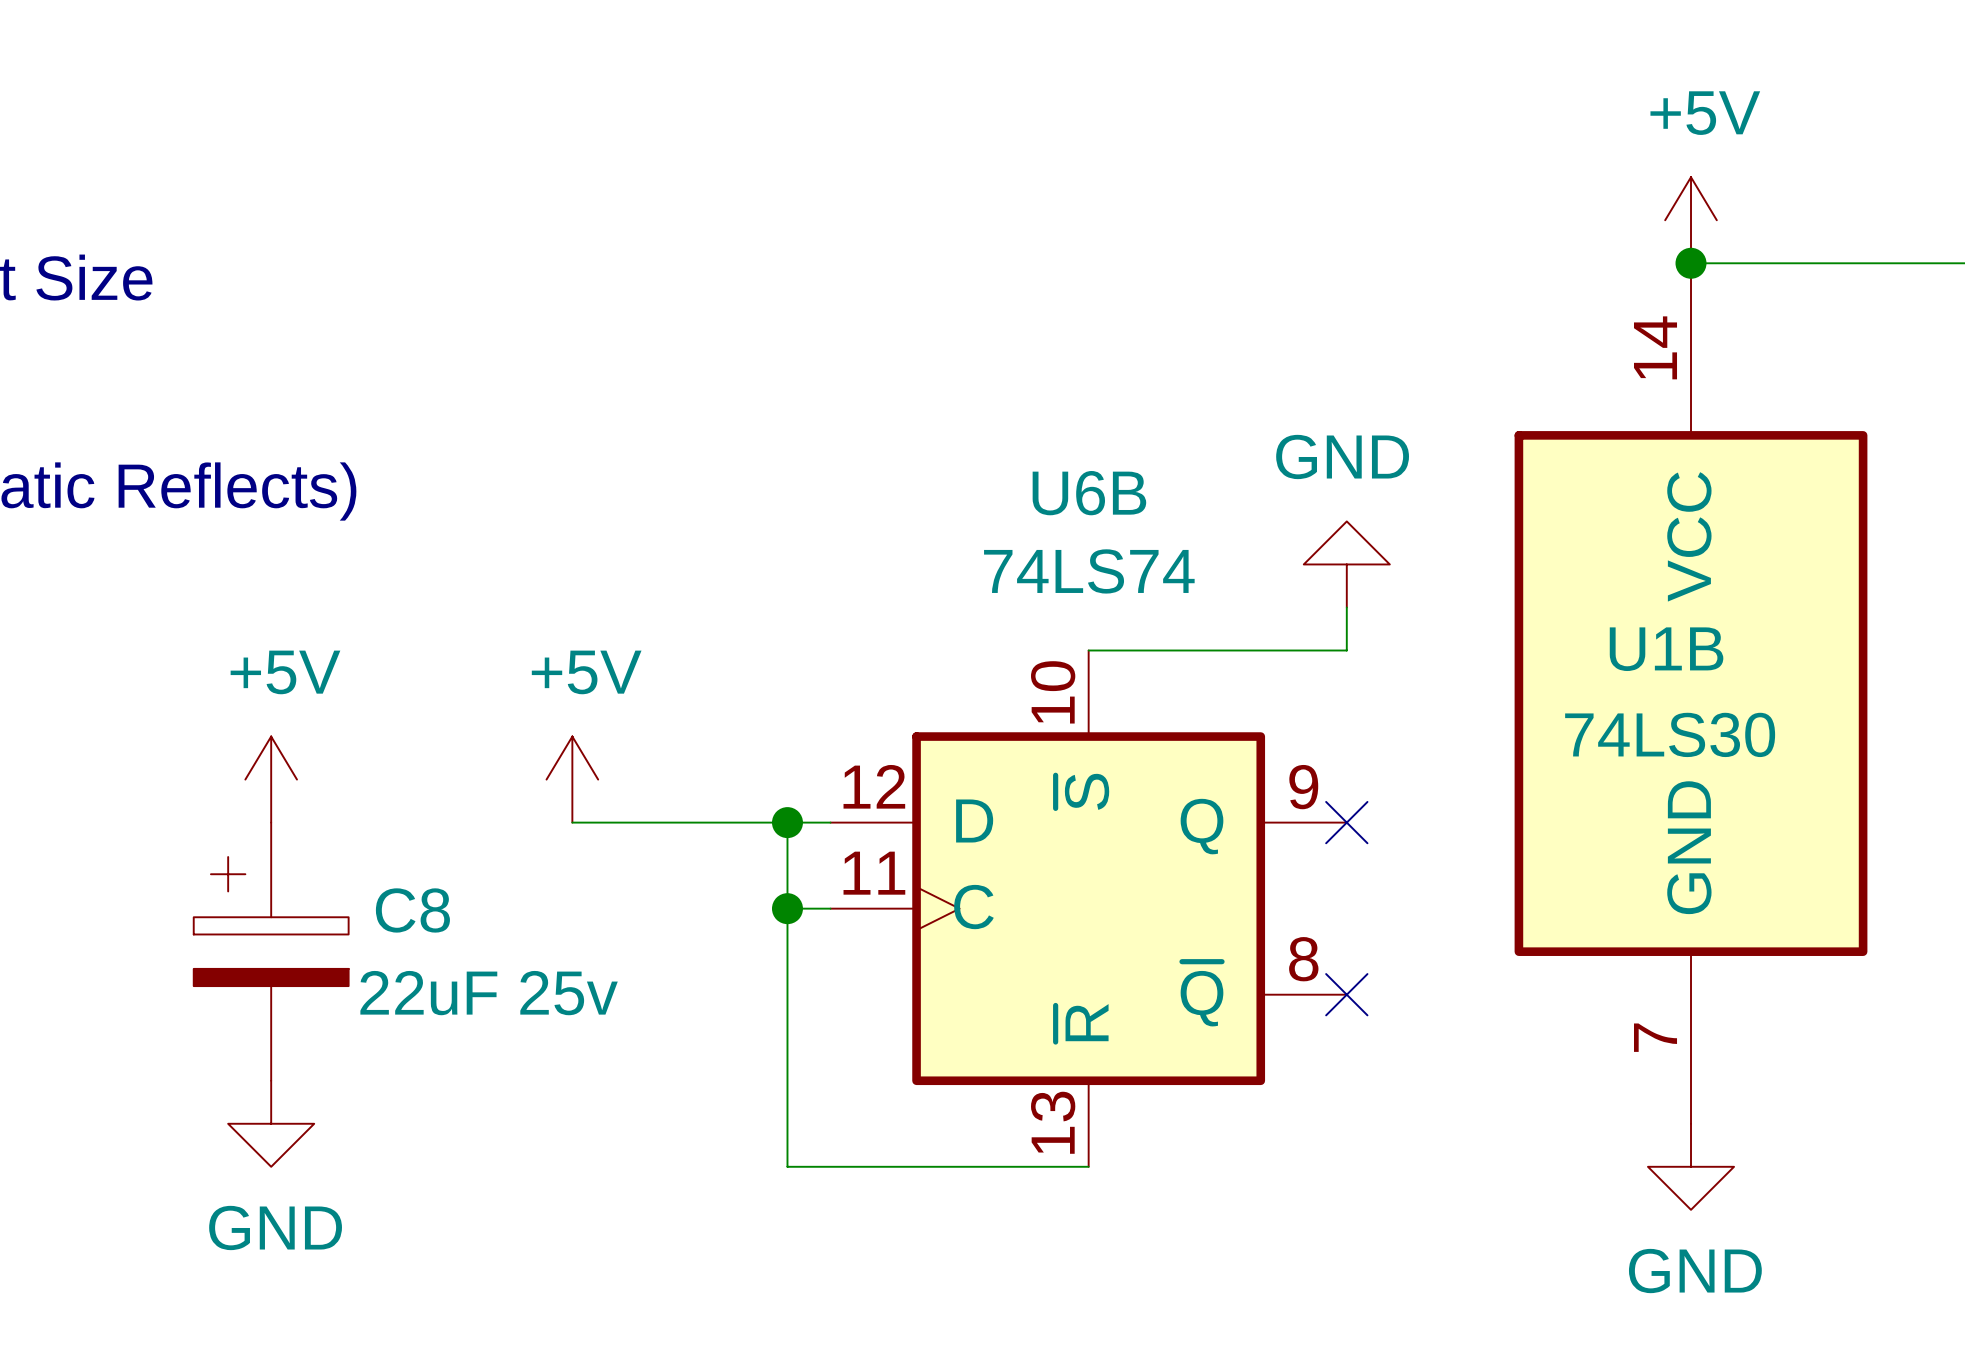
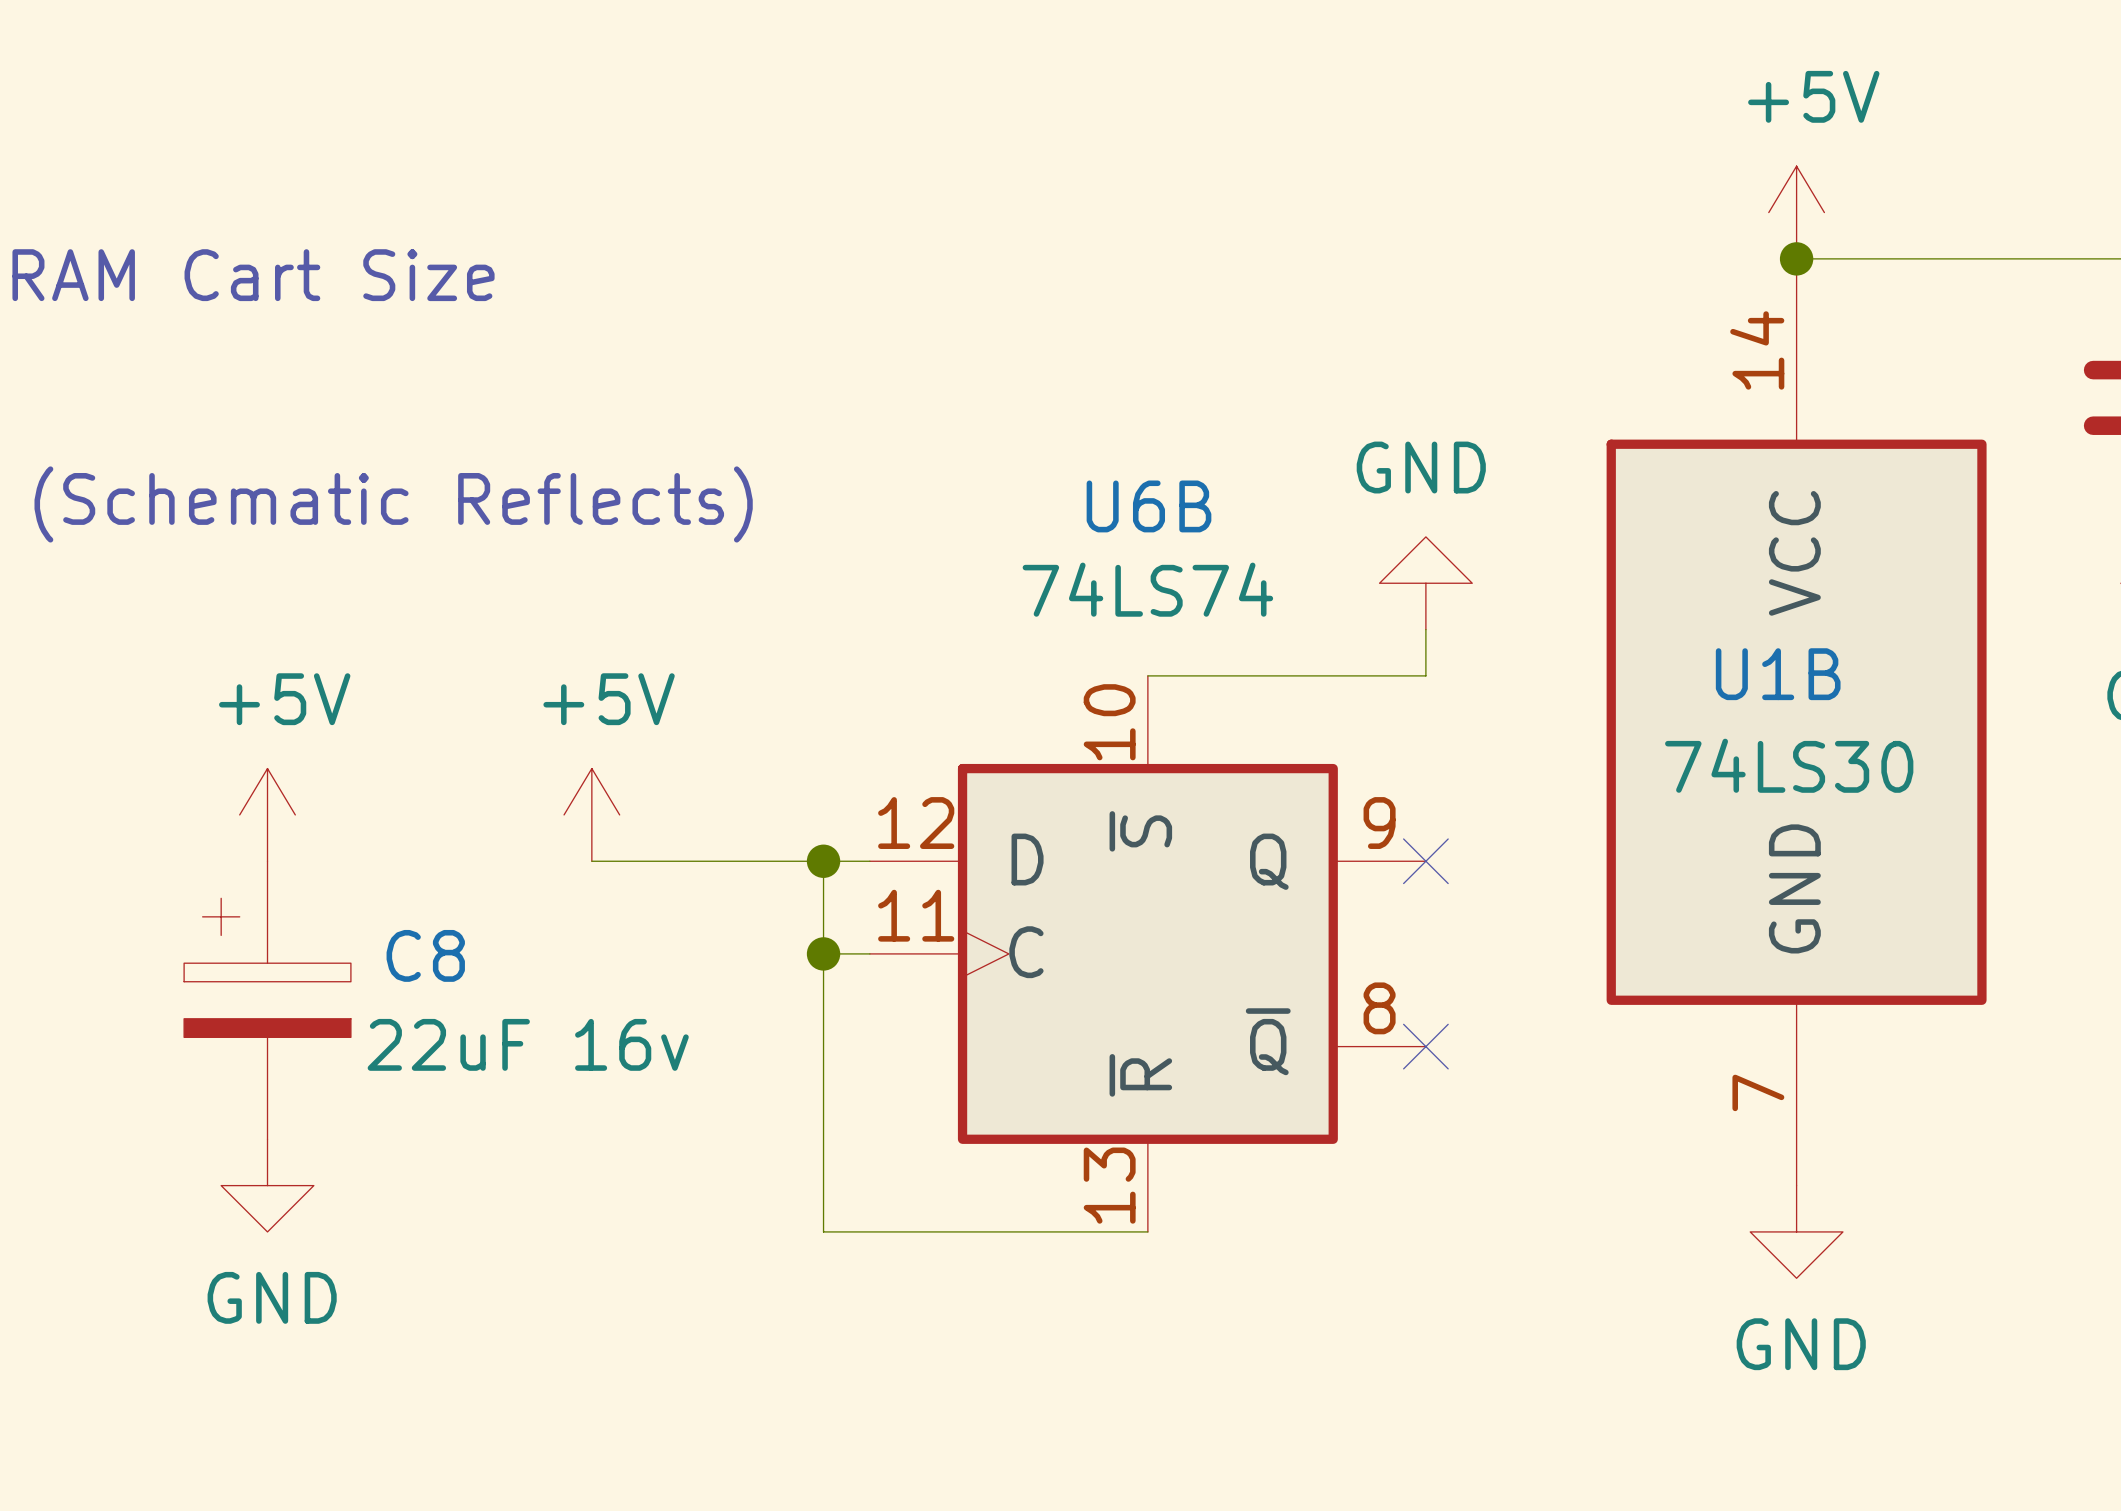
C8 value: 22uF 25v (489, 993) -> 22uF 16v (528, 1044)

